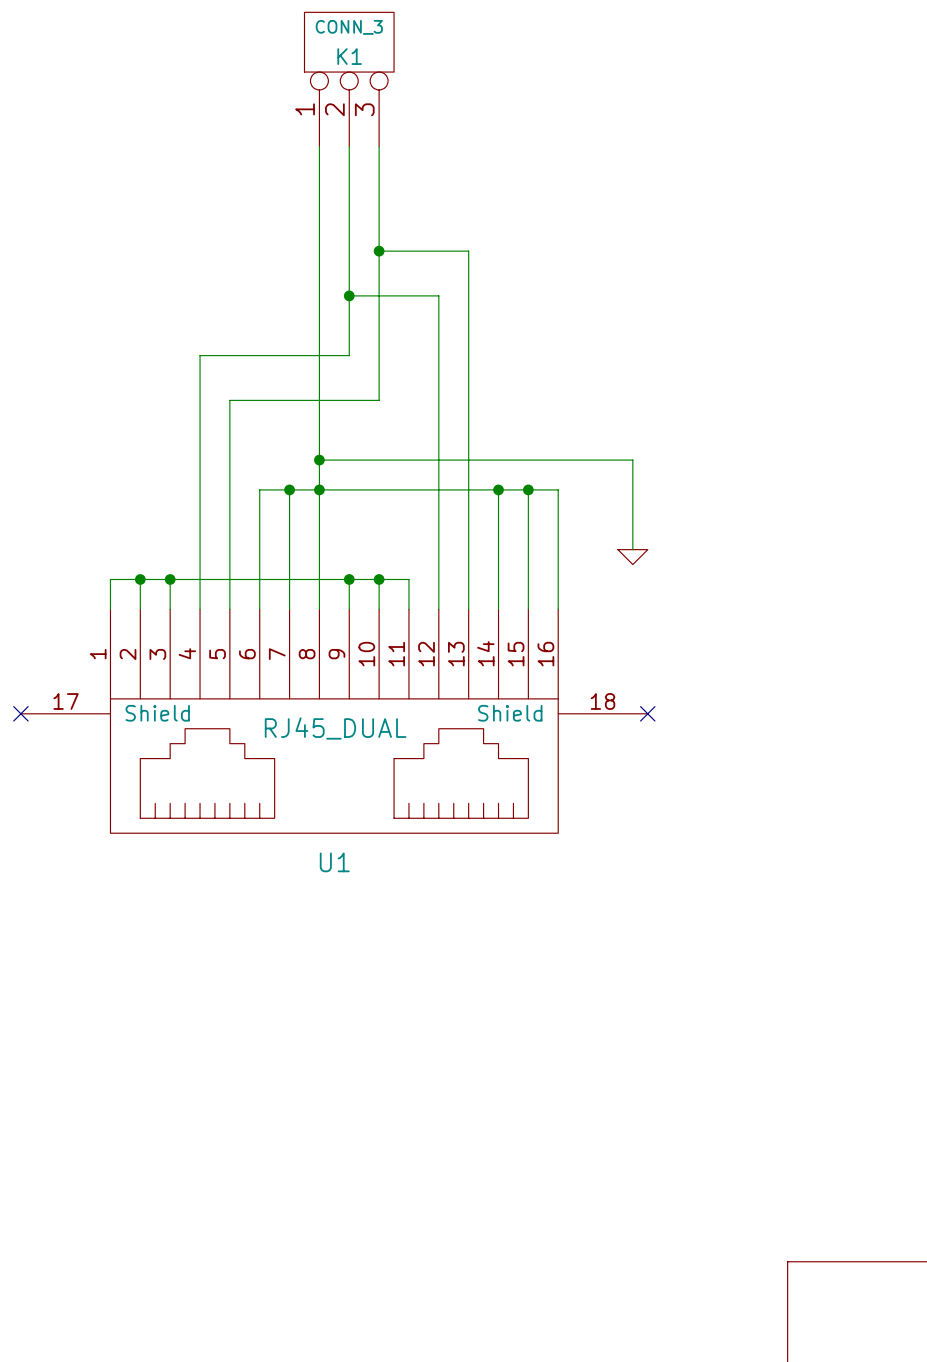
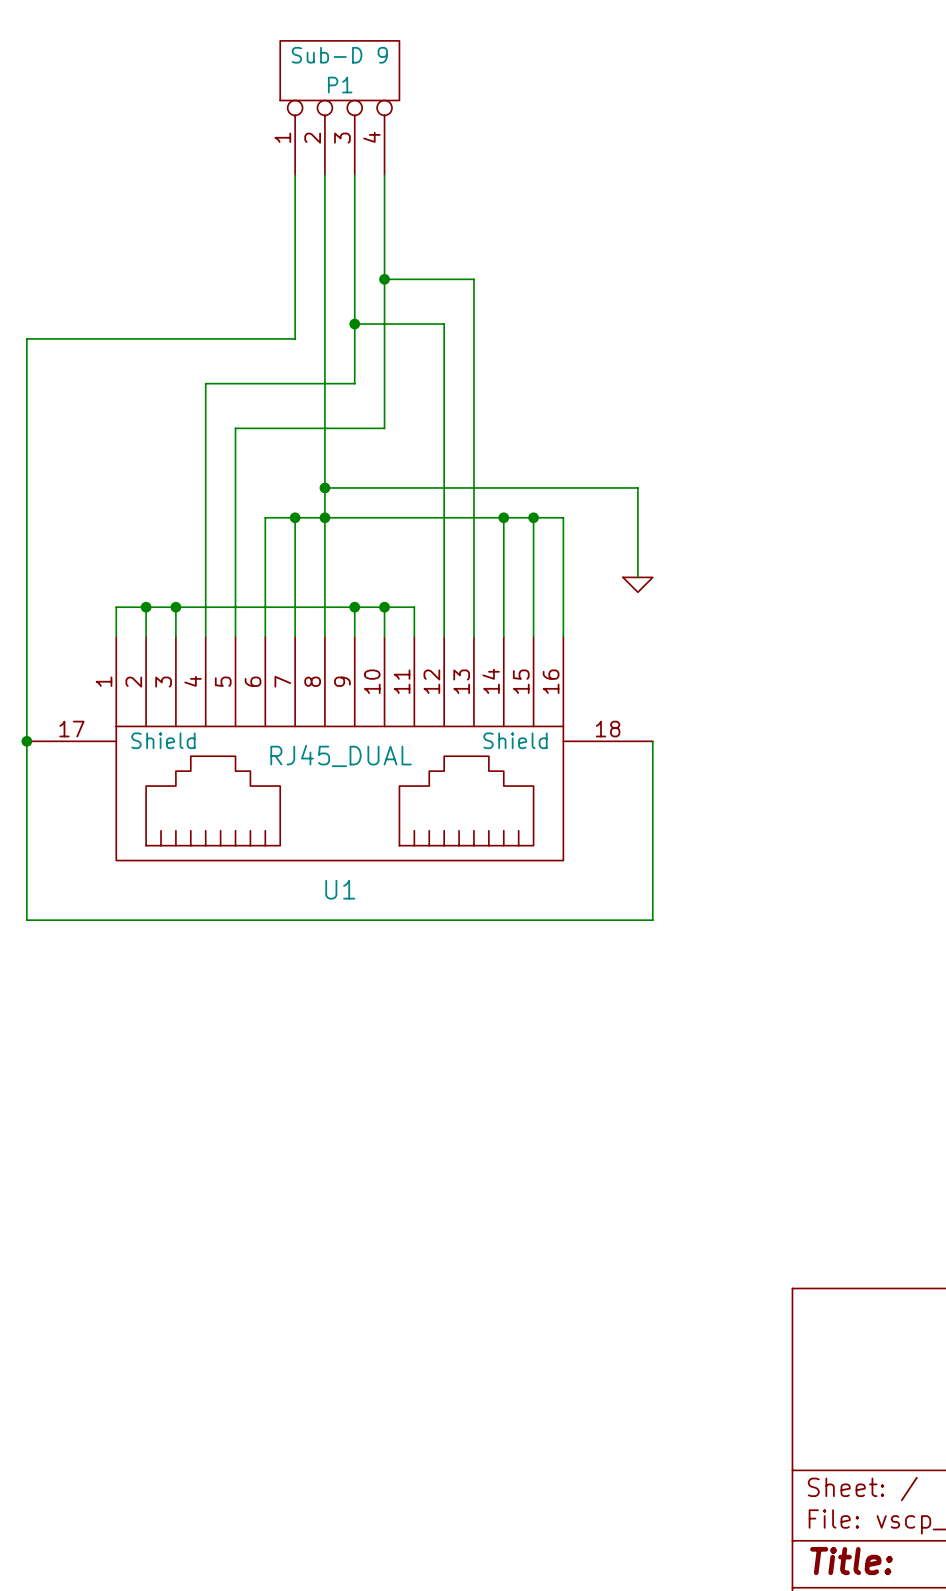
P1: none -> Sub-D 9 (339, 107)
K1: CONN_3 (349, 79) -> none
wire: none -> (295, 175) (295, 338) (26, 338) (26, 920) (652, 920) (652, 741)
no-connect mark: (20, 713) -> none
junction: none -> (26, 741)
no-connect mark: (647, 713) -> none

